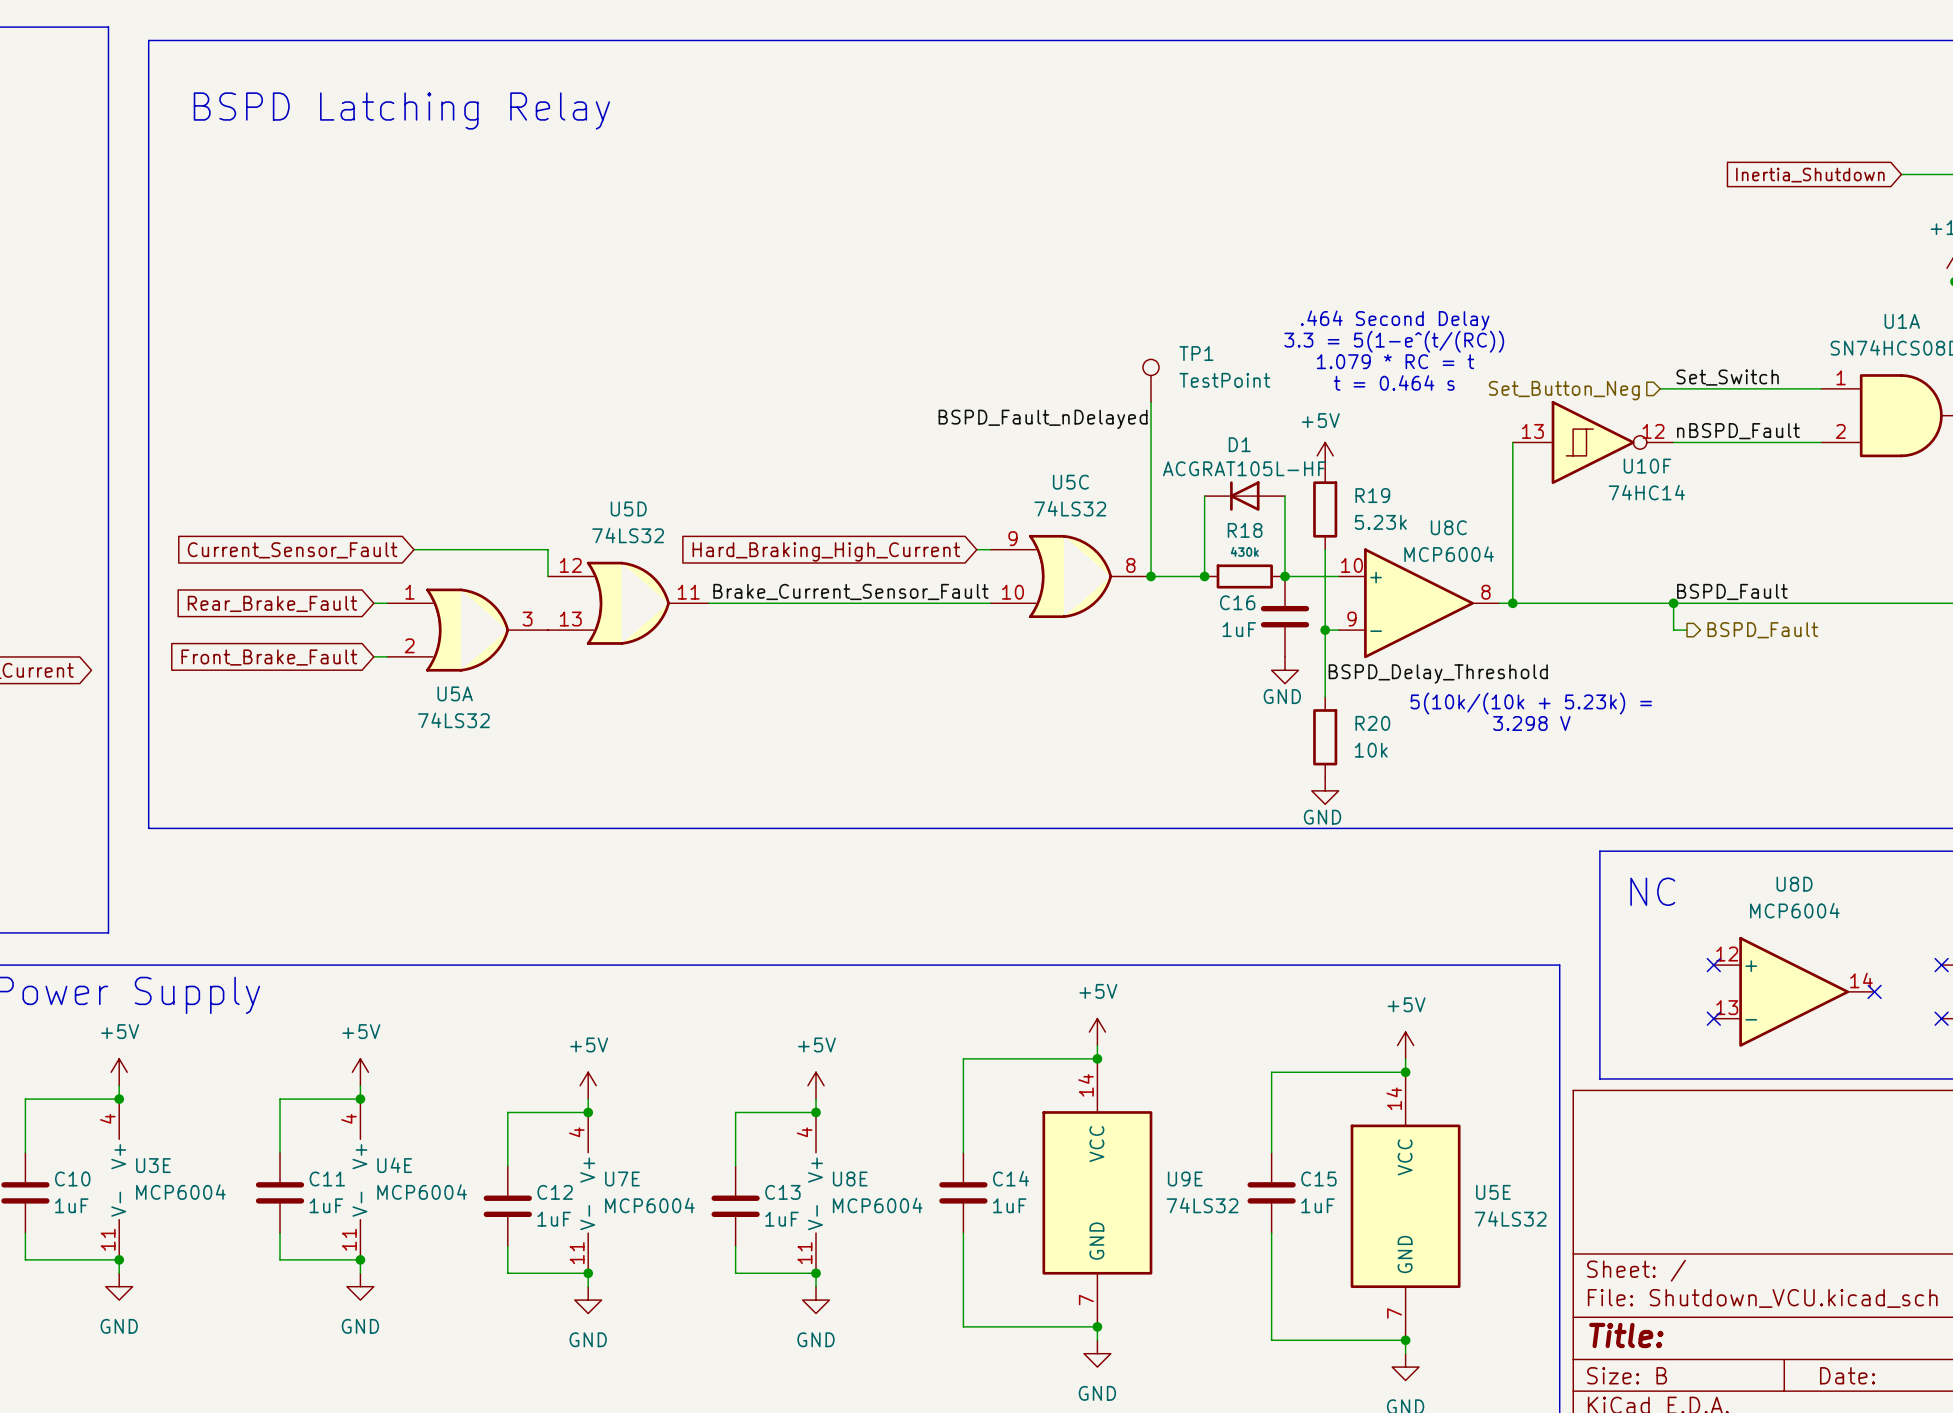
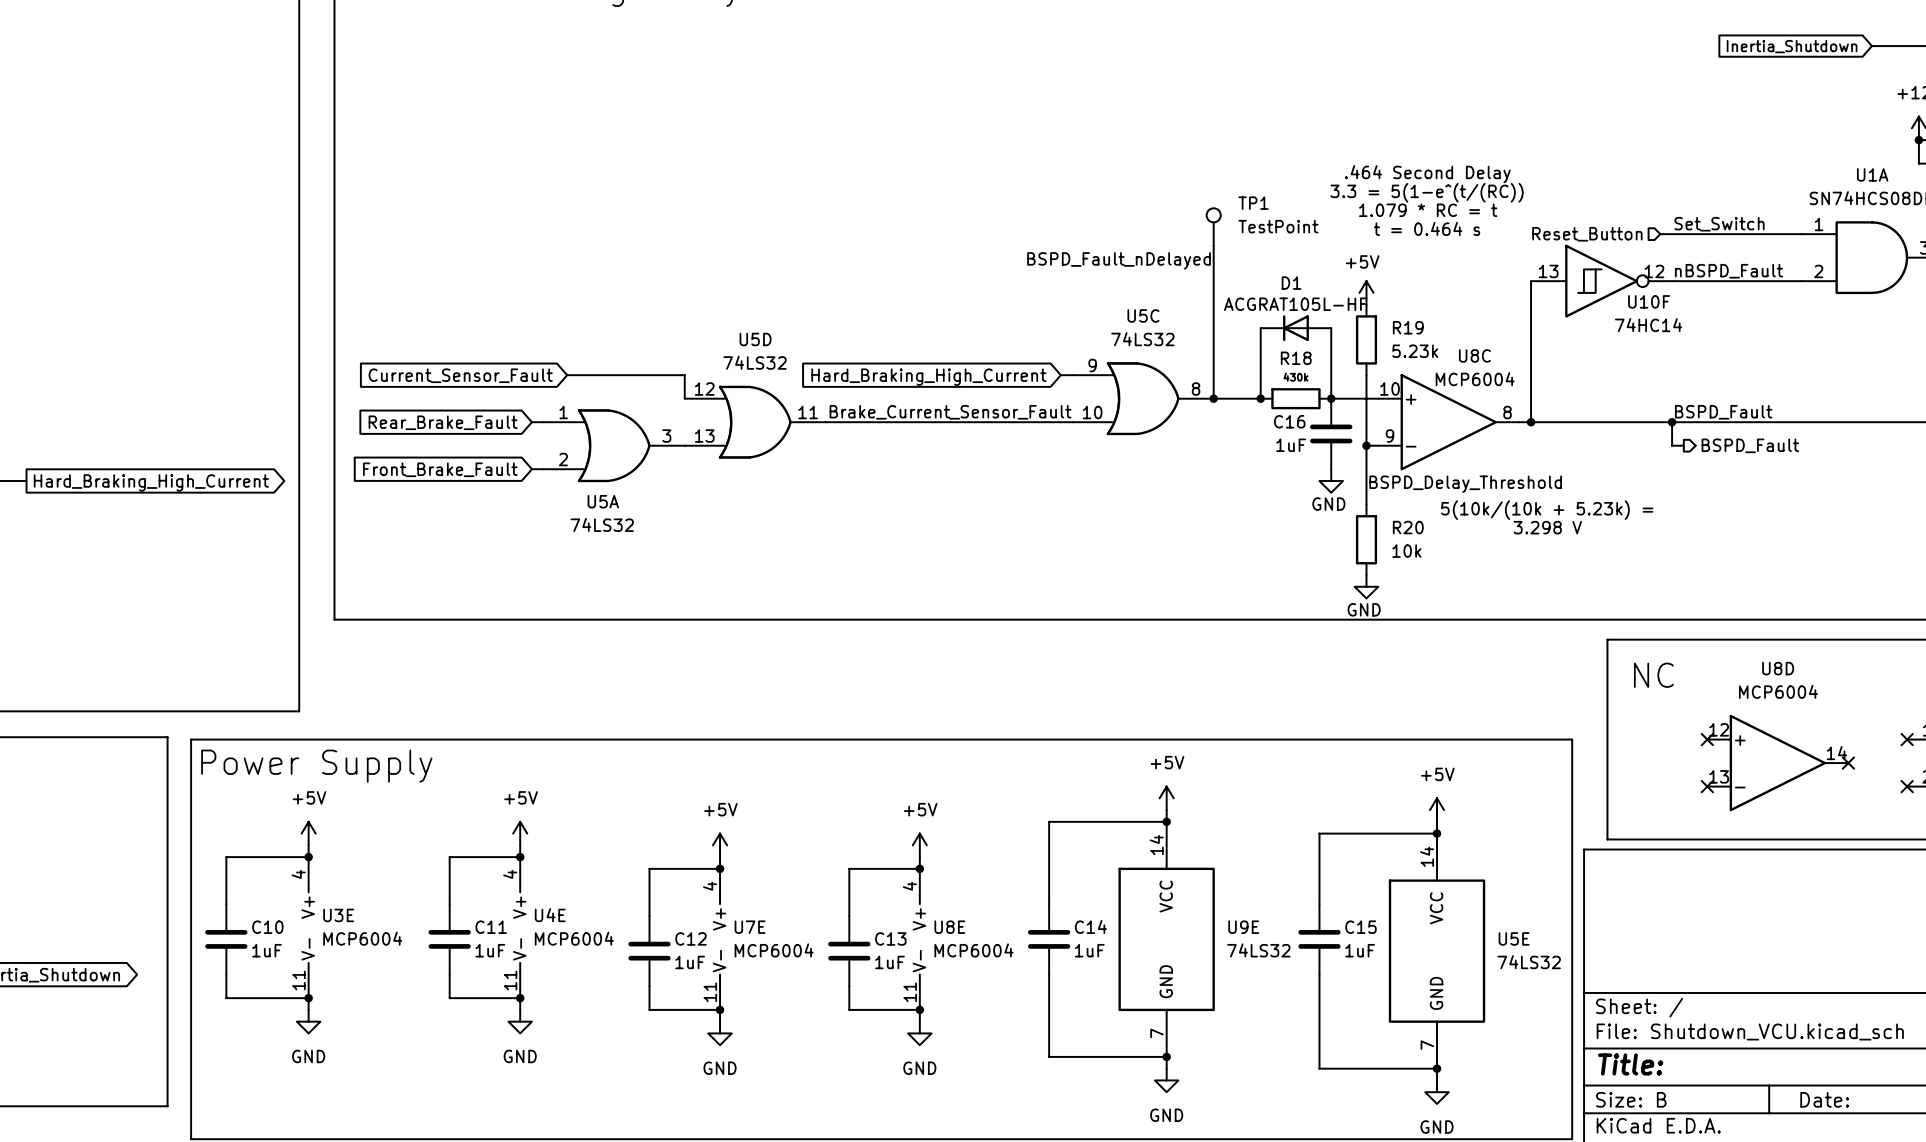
hierarchical label: Set_Button_Neg (1564, 390) -> Reset_Button (1587, 234)

